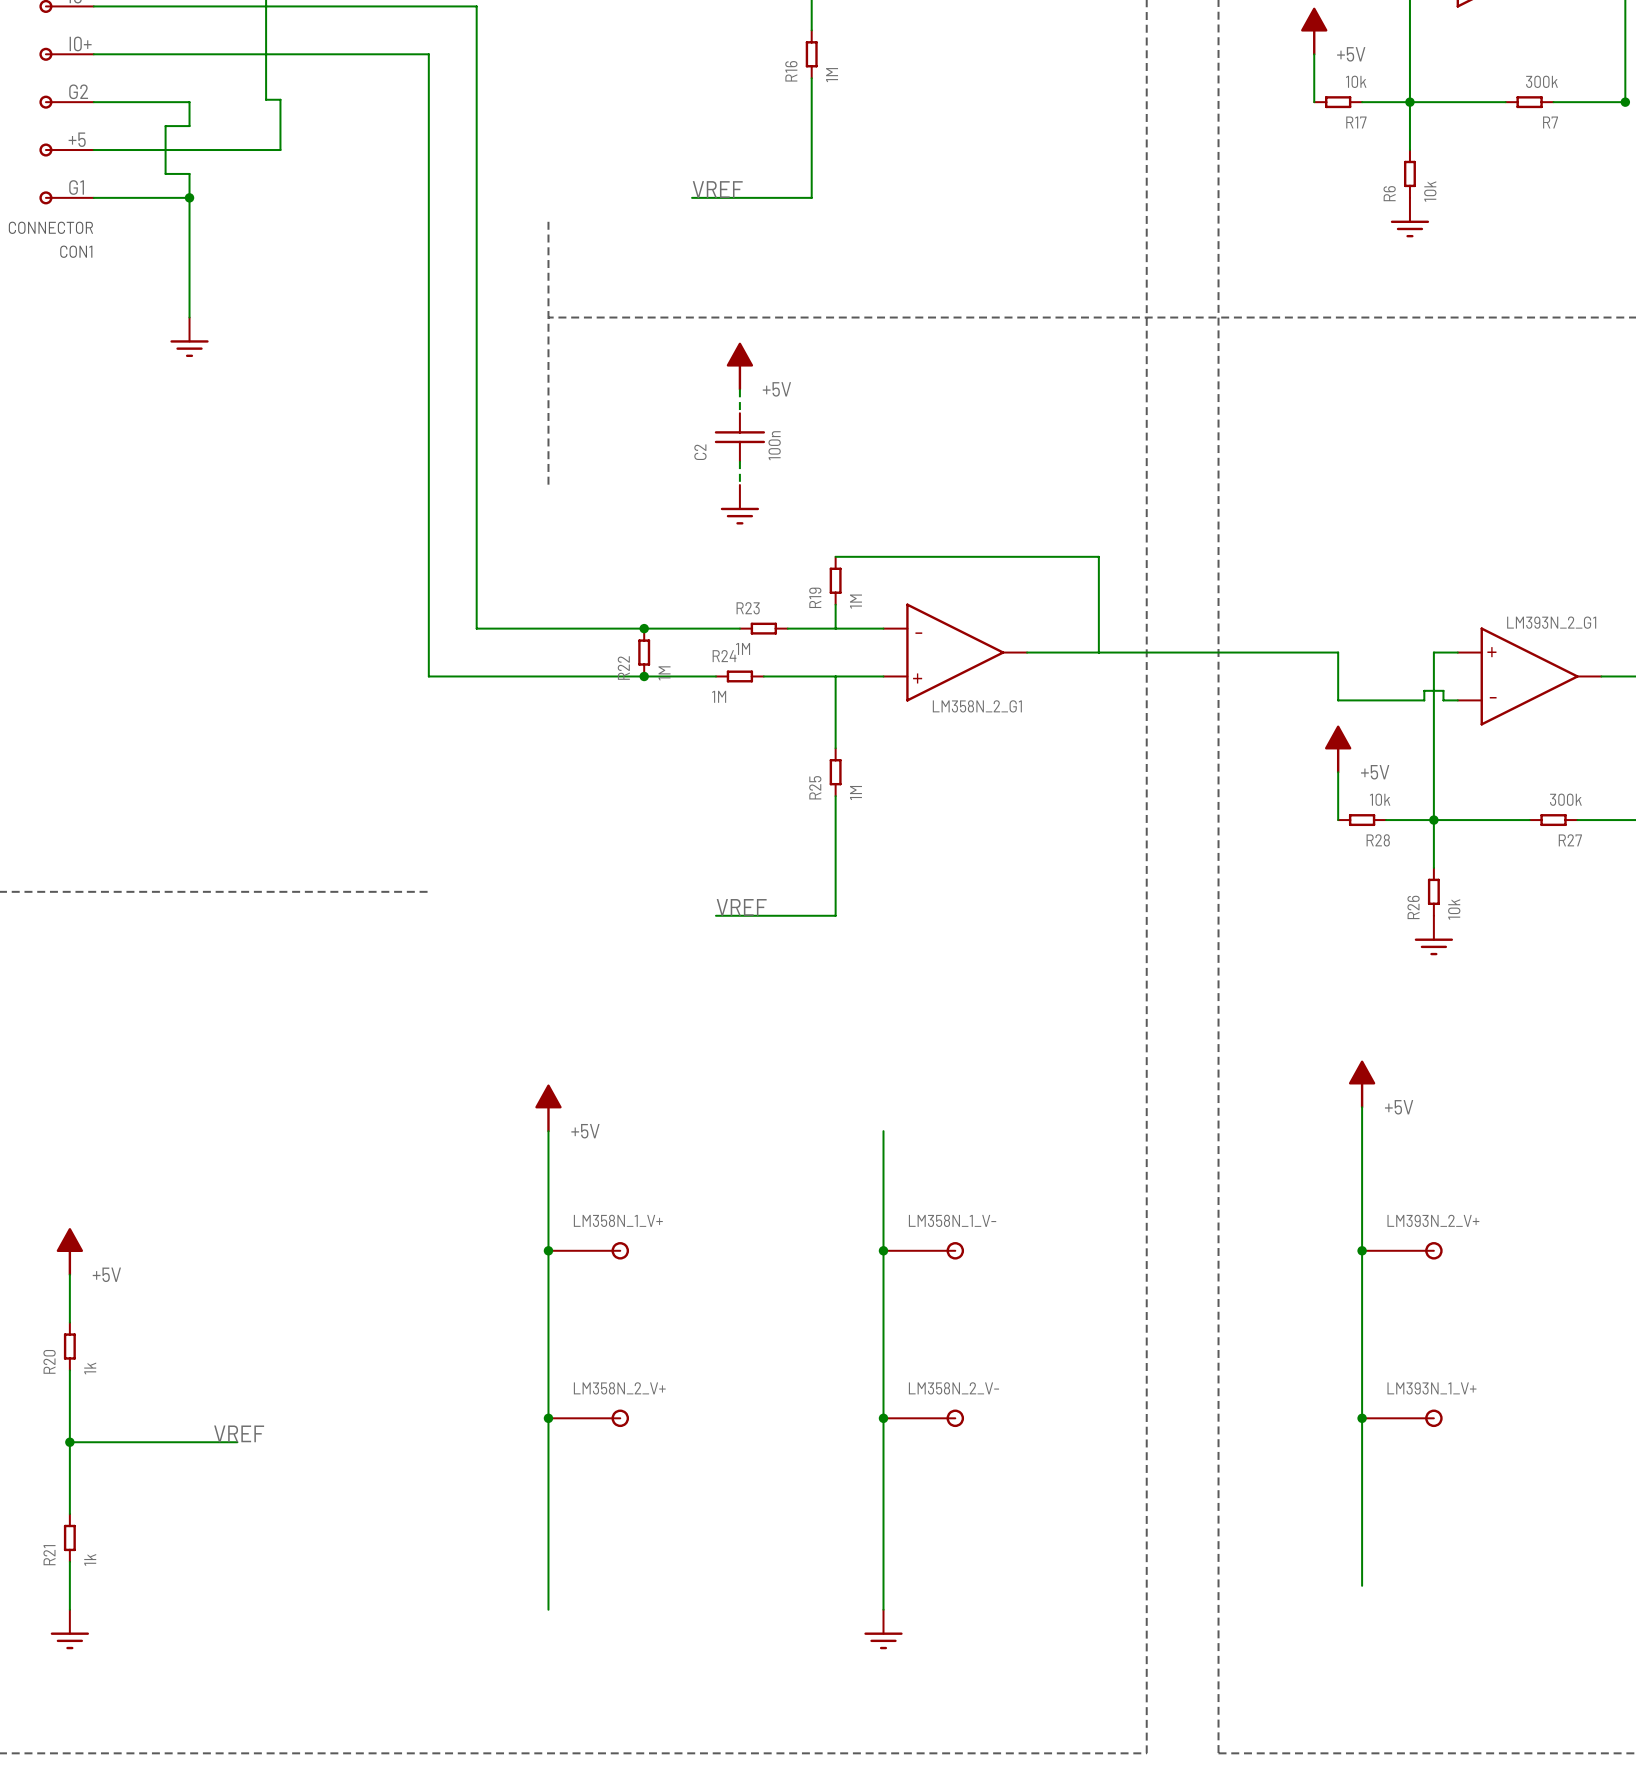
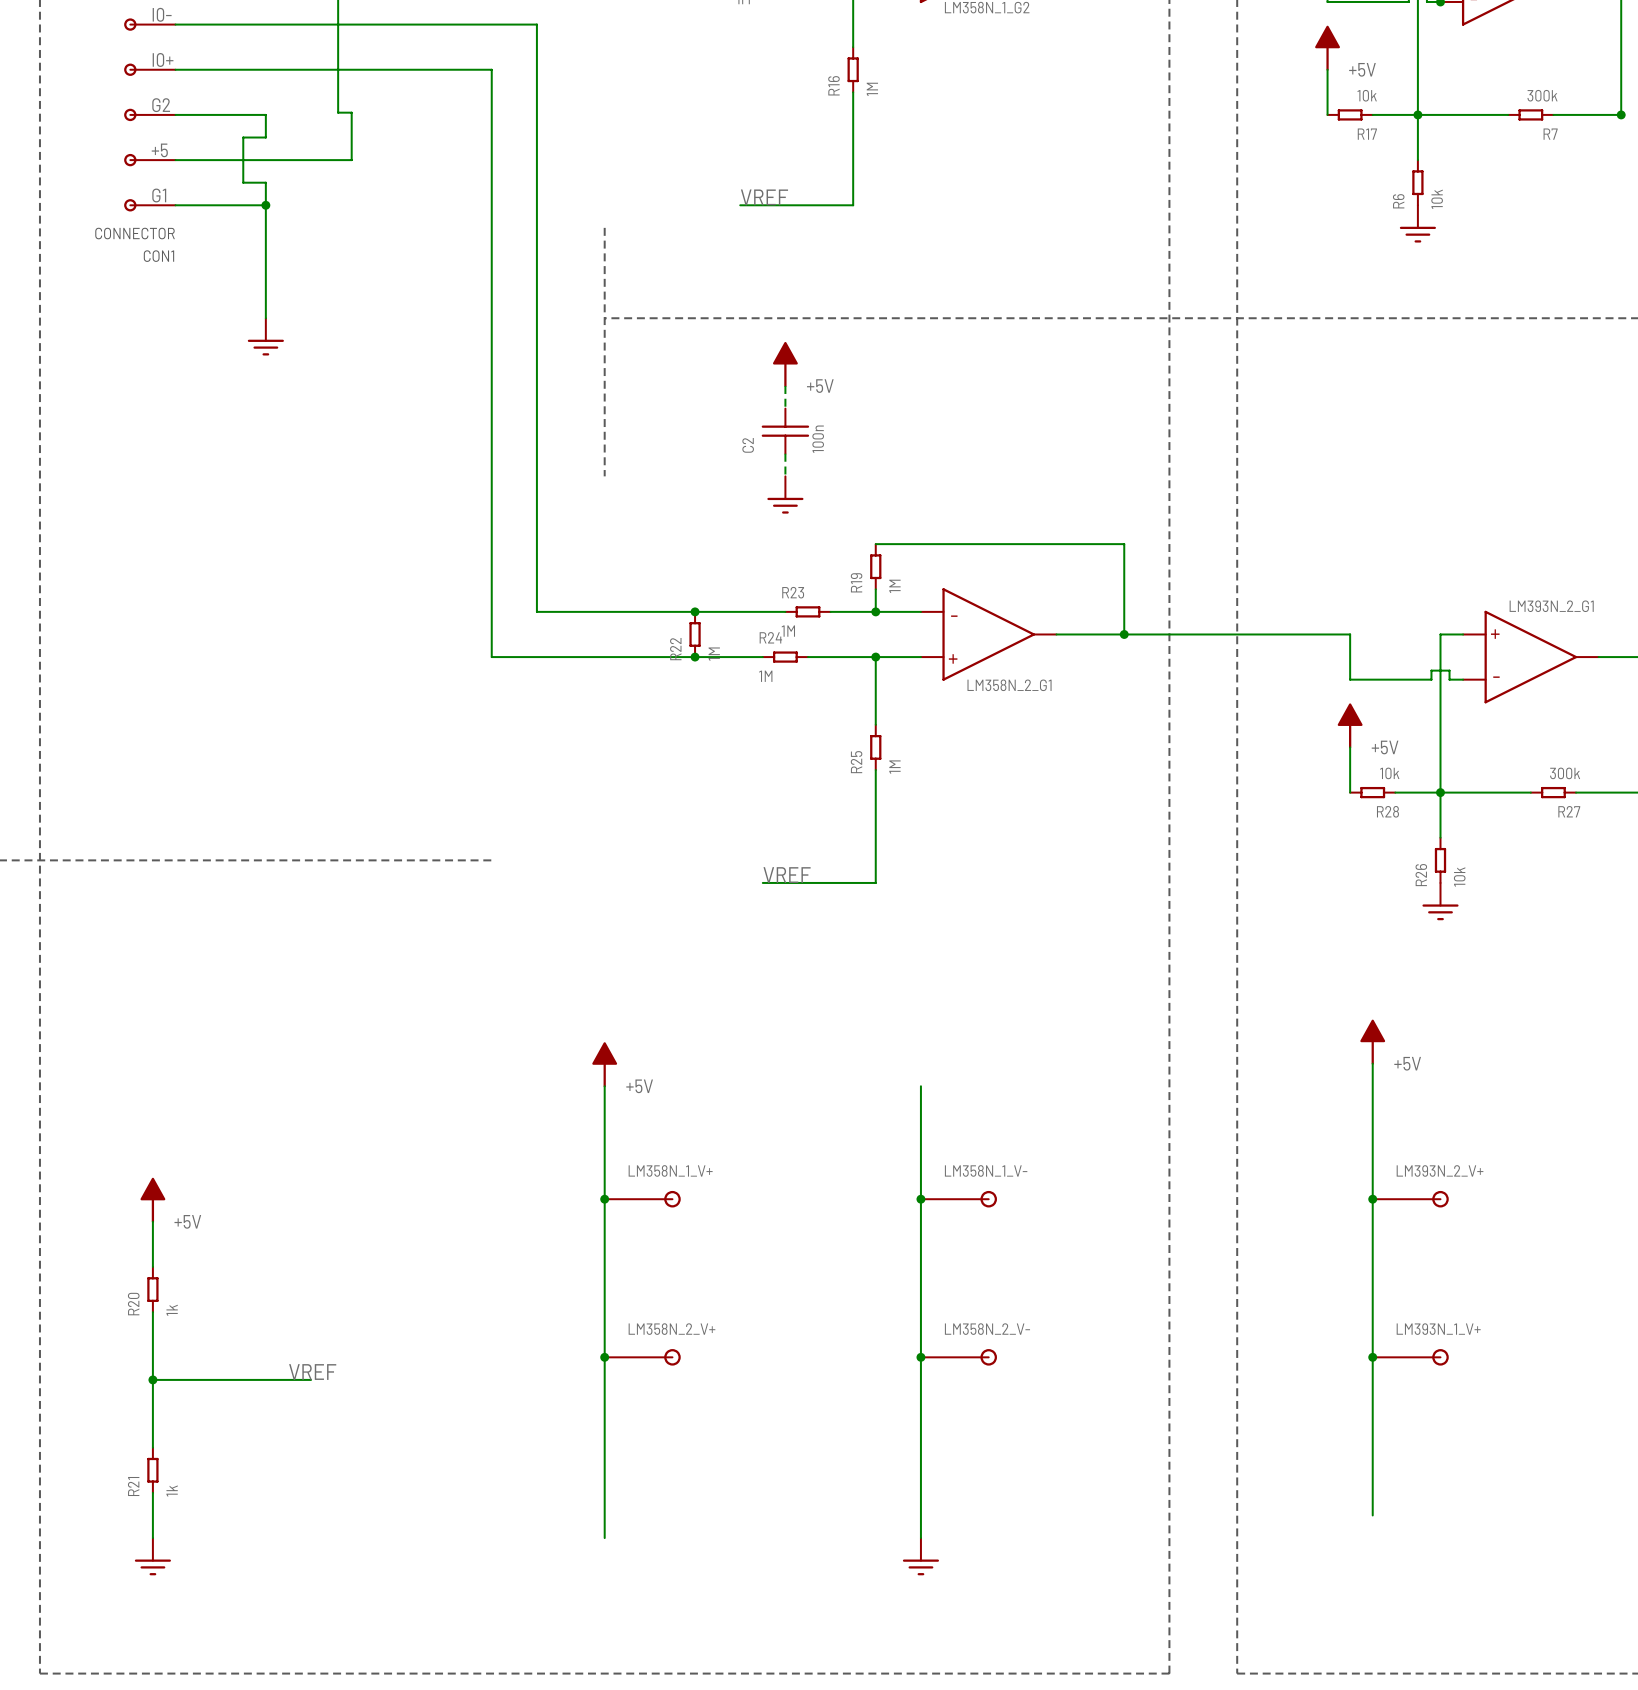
junction: none -> (875, 611)
junction: none -> (1124, 634)
junction: none -> (875, 657)

